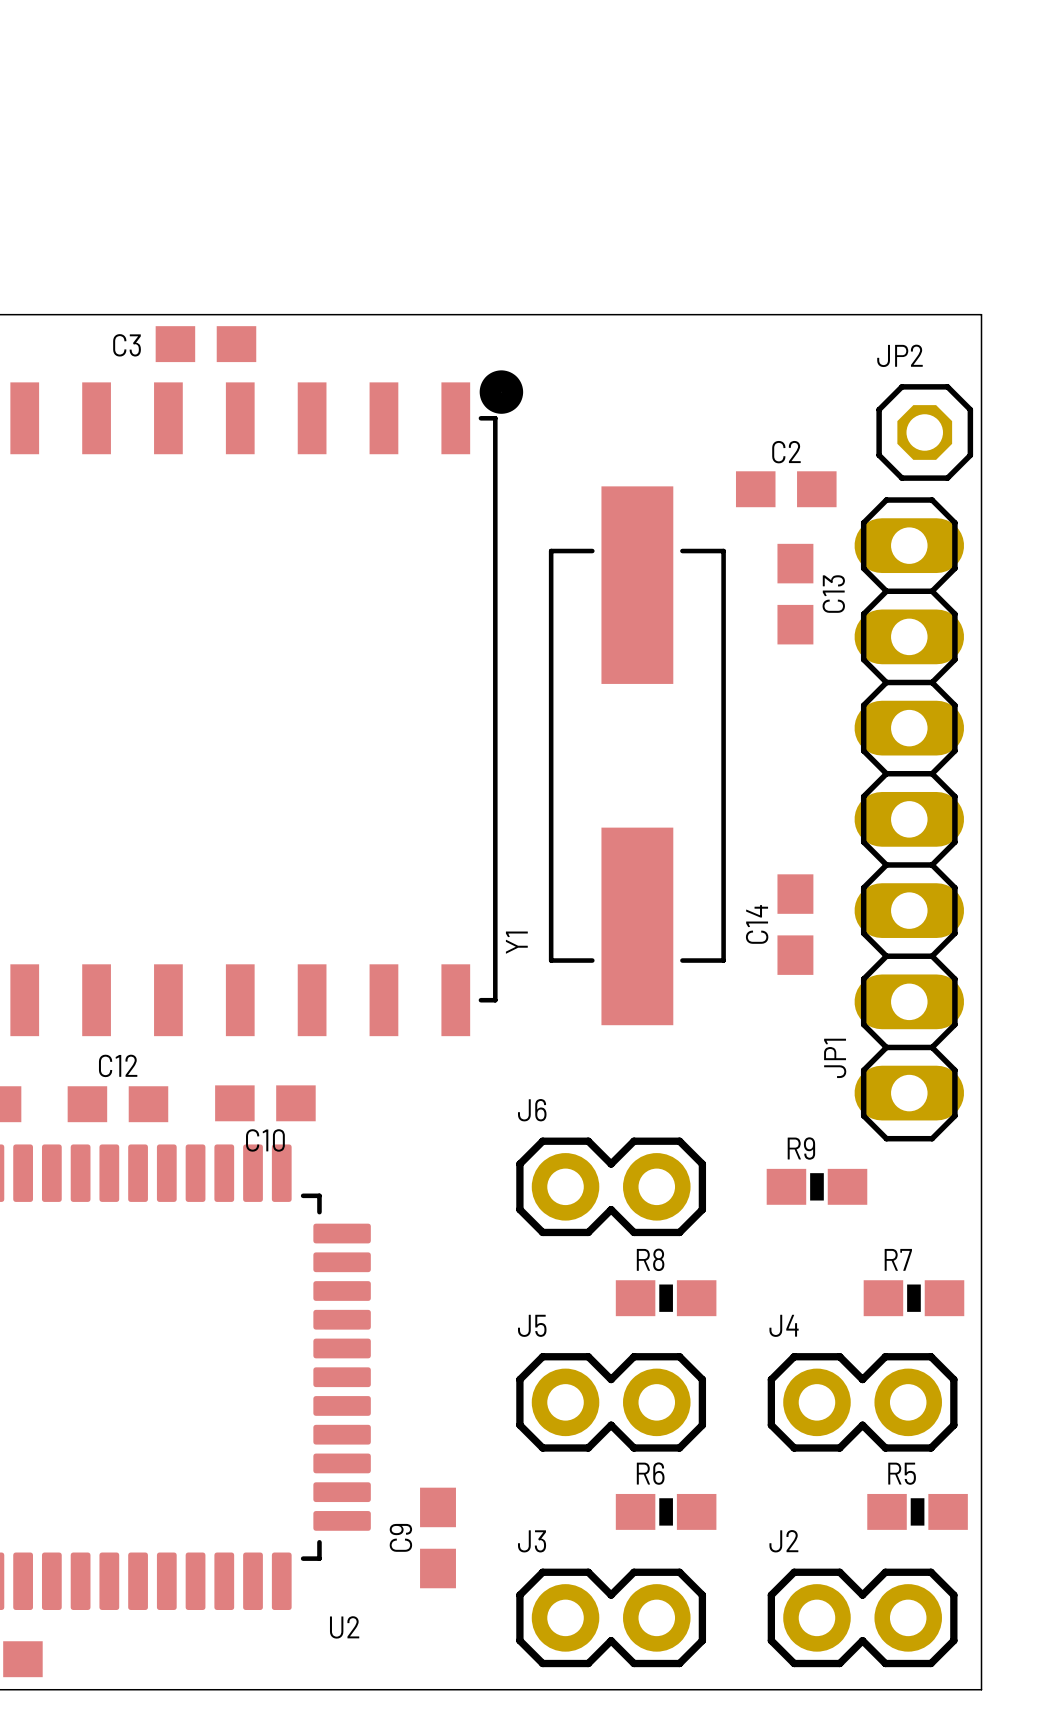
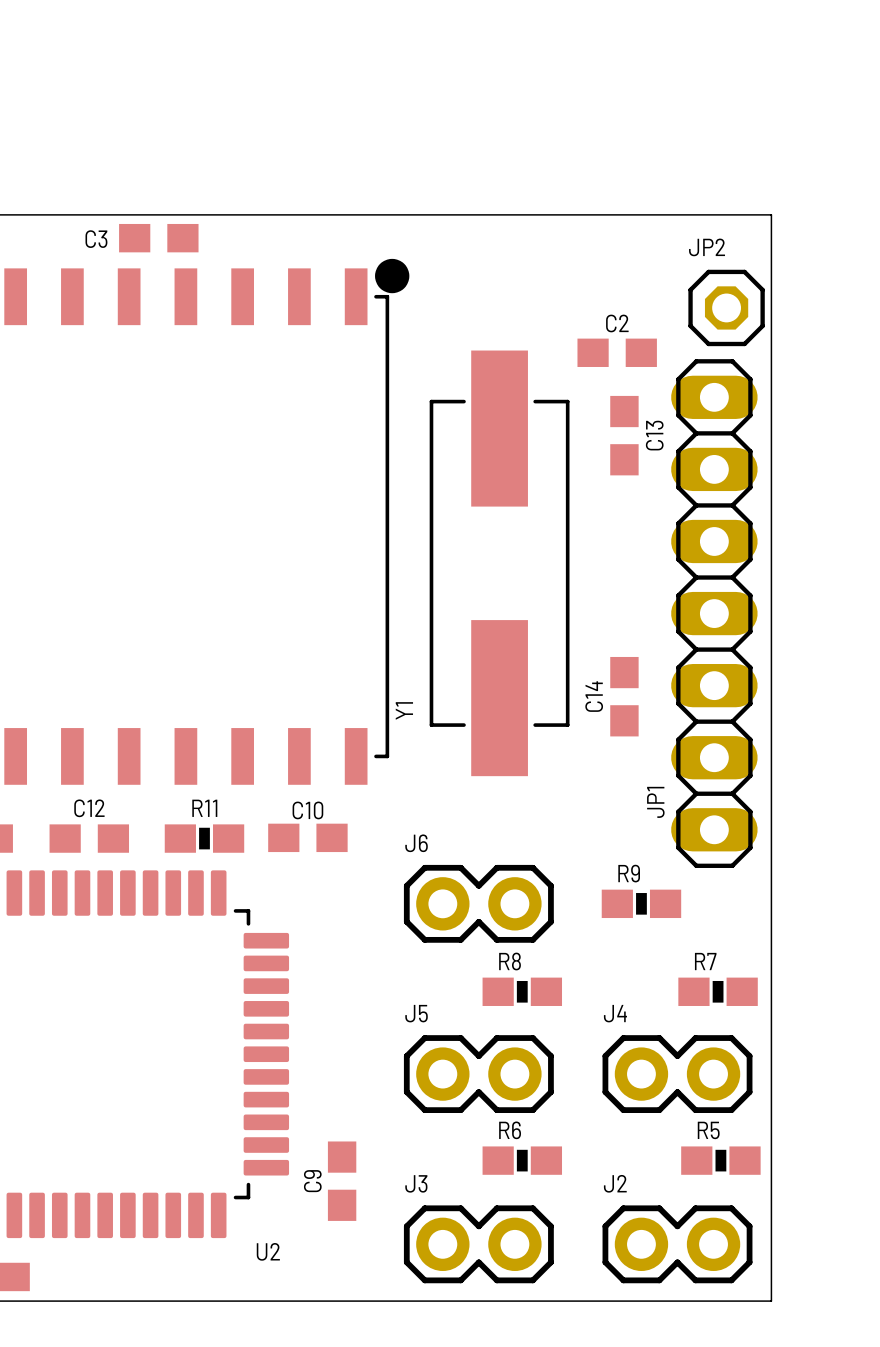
C10 position: (265, 1103) -> (307, 837)
R11: none -> (204, 838)
C10 name position: C10 (265, 1140) -> C10 (307, 810)

